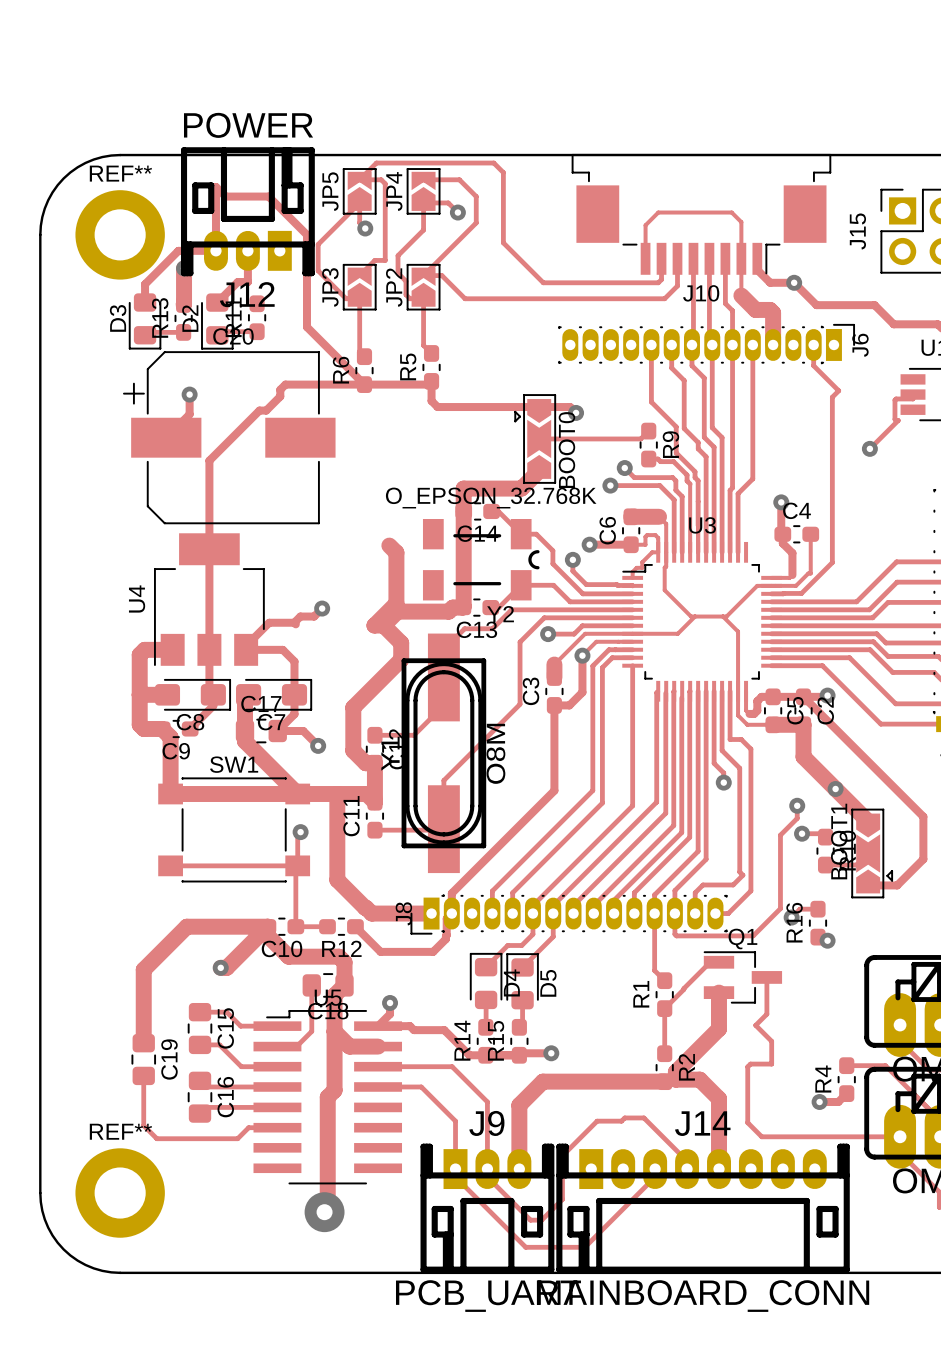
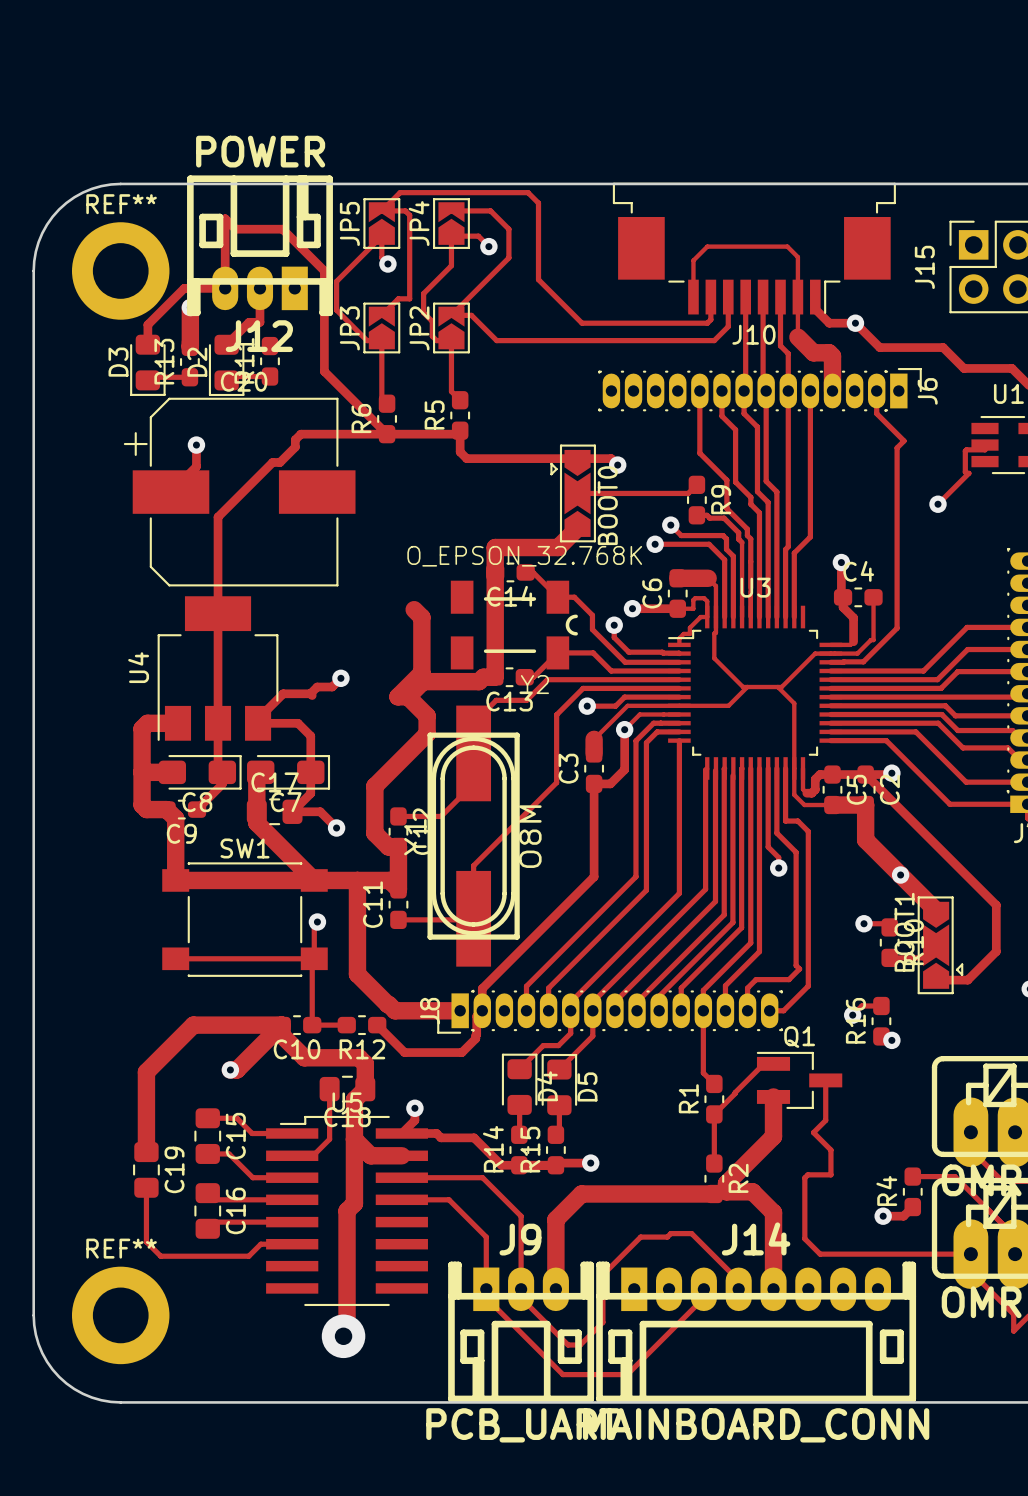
track: (797, 805) (797, 818) (780, 835) (780, 908) (753, 935) (676, 935) (674, 913) -> none
via: (797, 805) -> none

